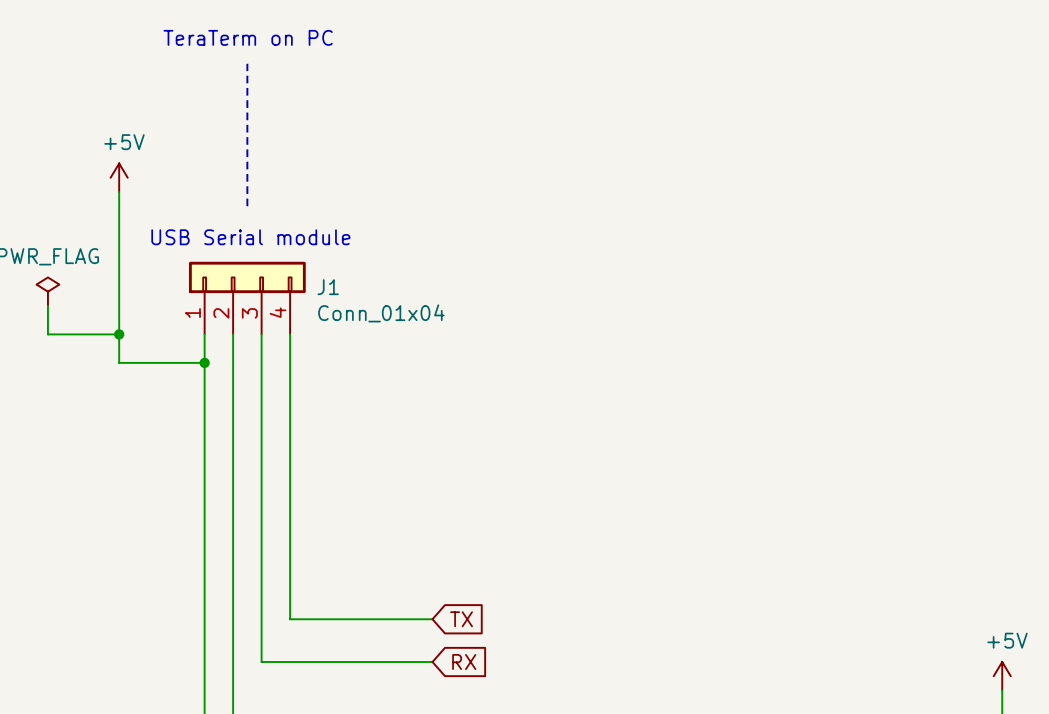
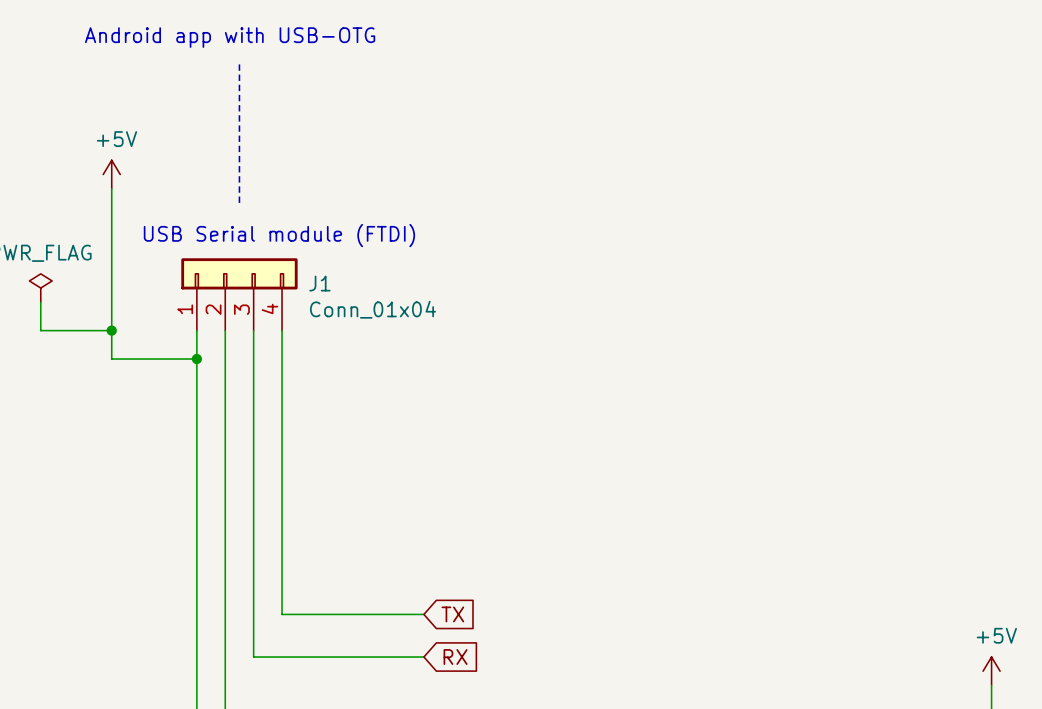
text: TeraTerm on PC (248, 37) -> none
text: none -> Android app with USB-OTG (230, 37)
text: USB Serial module (250, 237) -> USB Serial module (FTDI) (279, 235)

